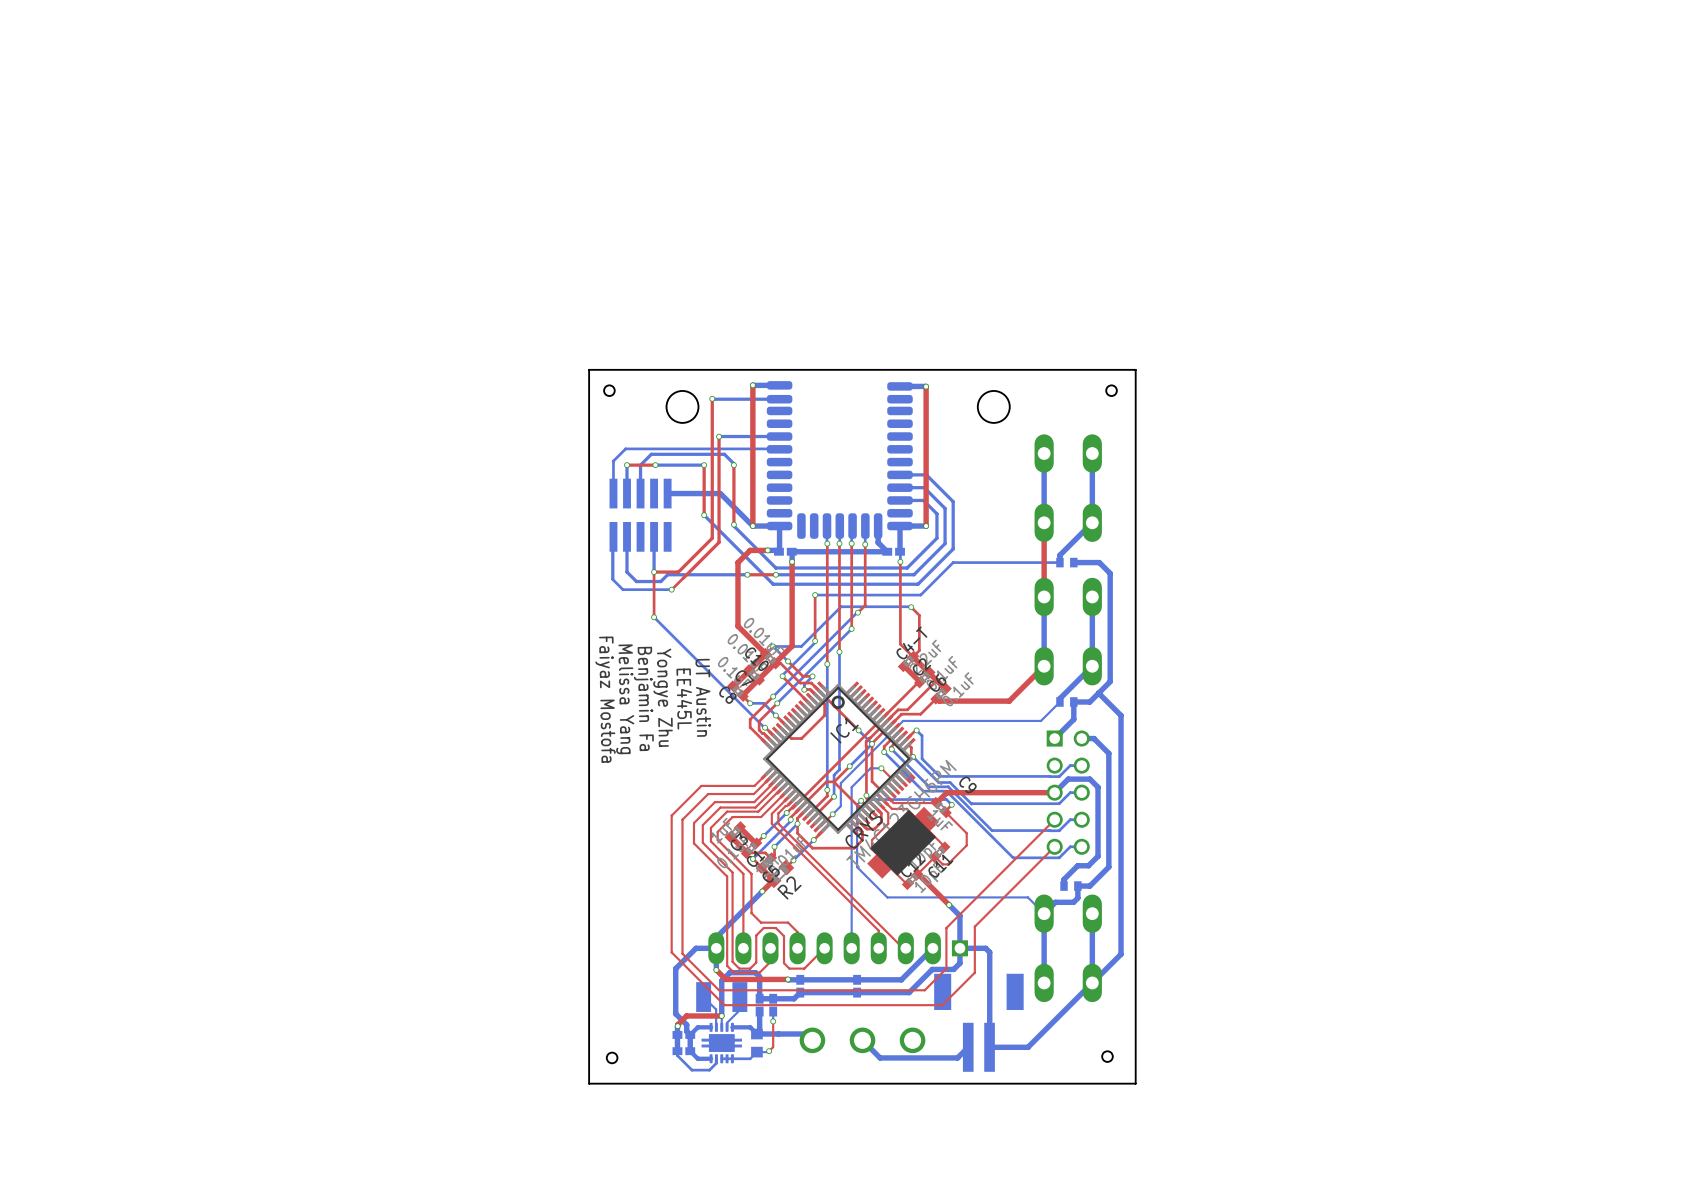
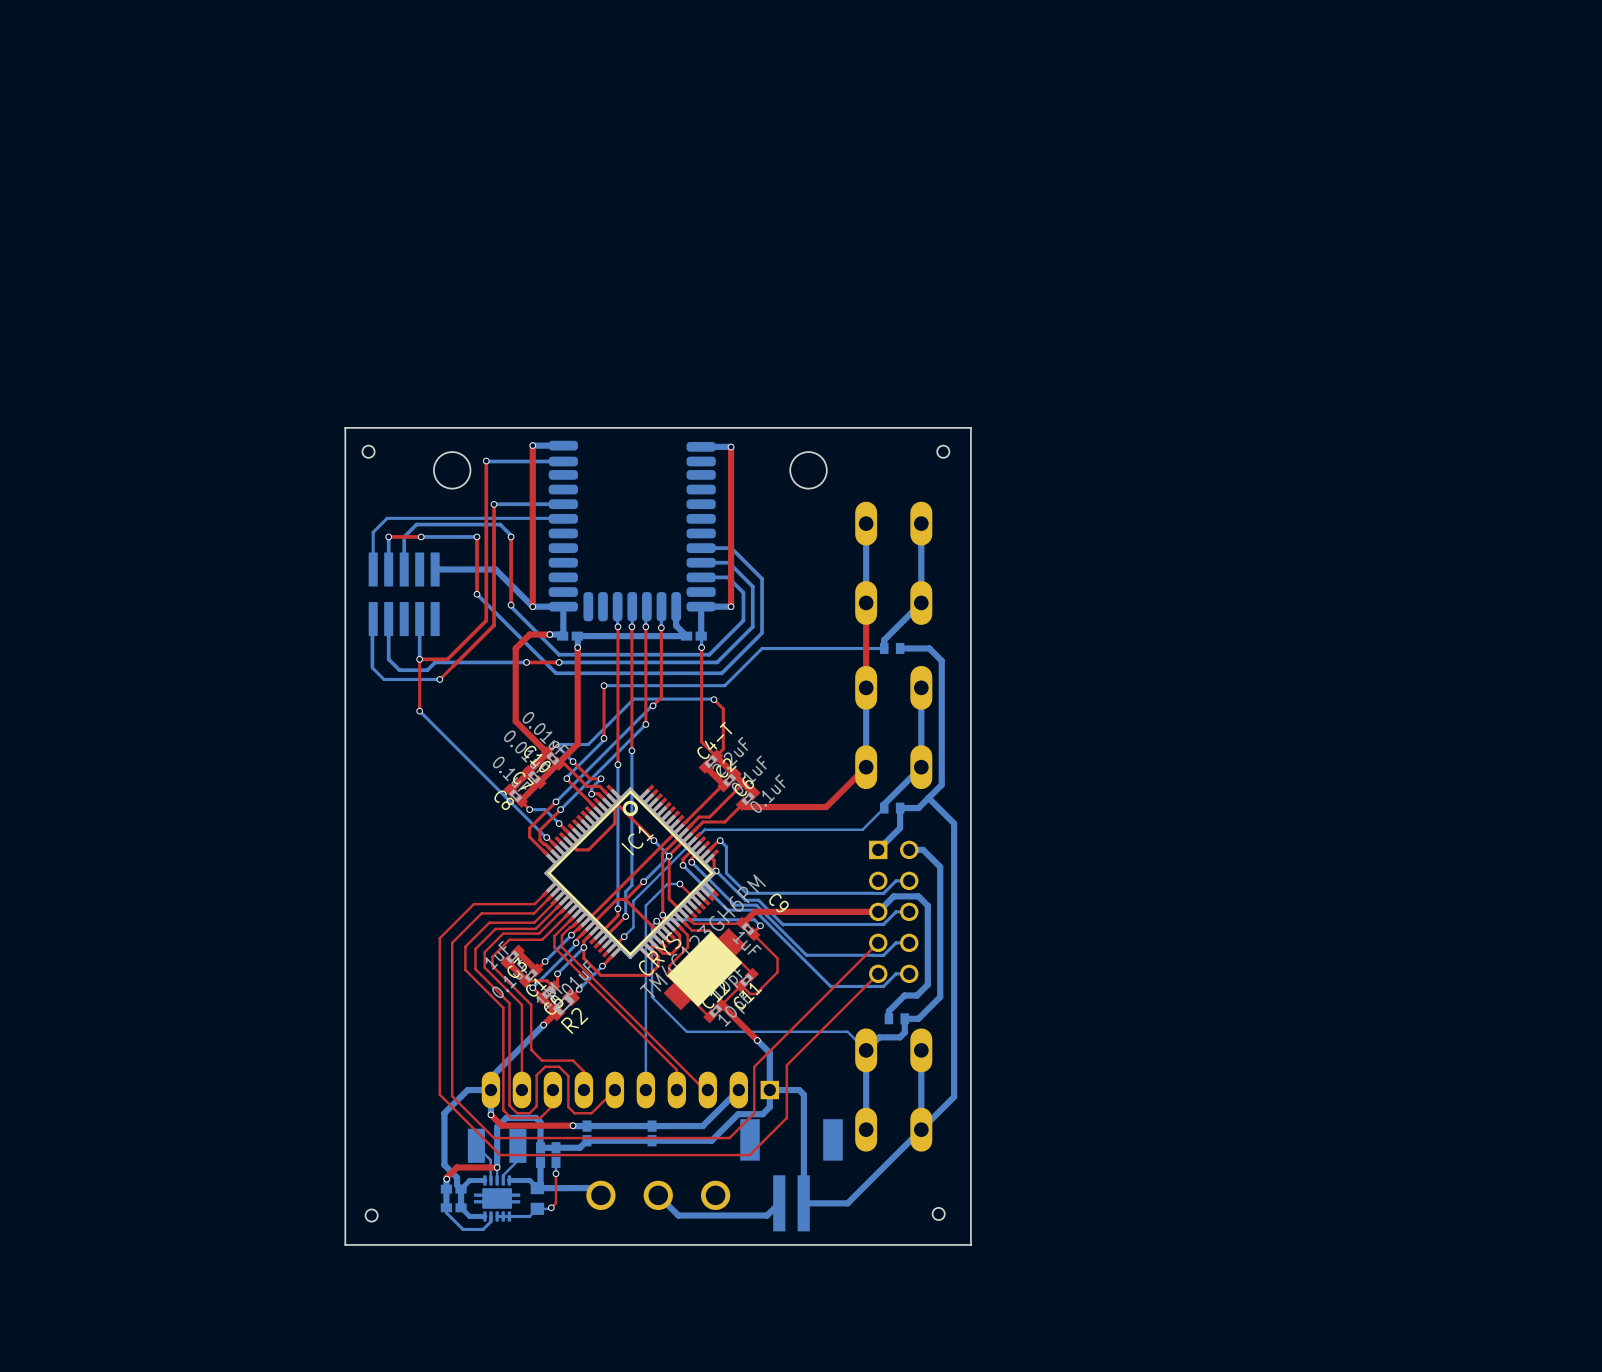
text: Yongye Zhu (663, 697) -> none
text: UT Austin (703, 697) -> none
text: Benjamin Fa (643, 698) -> none
text: Faiyaz Mostofa (605, 699) -> none
text: Melissa Yang (625, 699) -> none
text: EE445L (684, 699) -> none

